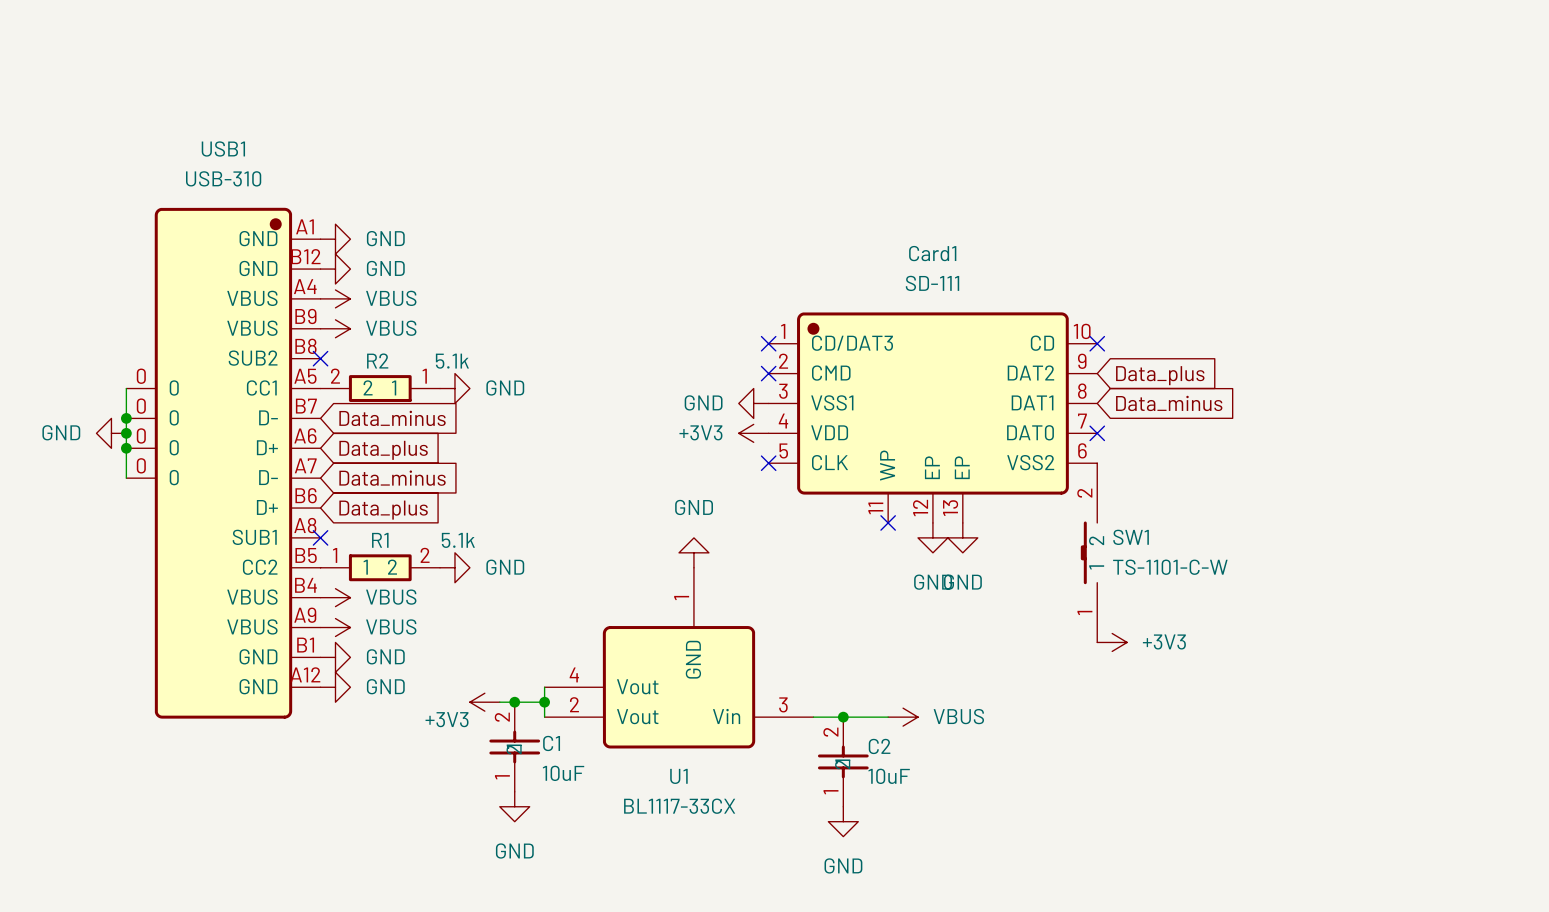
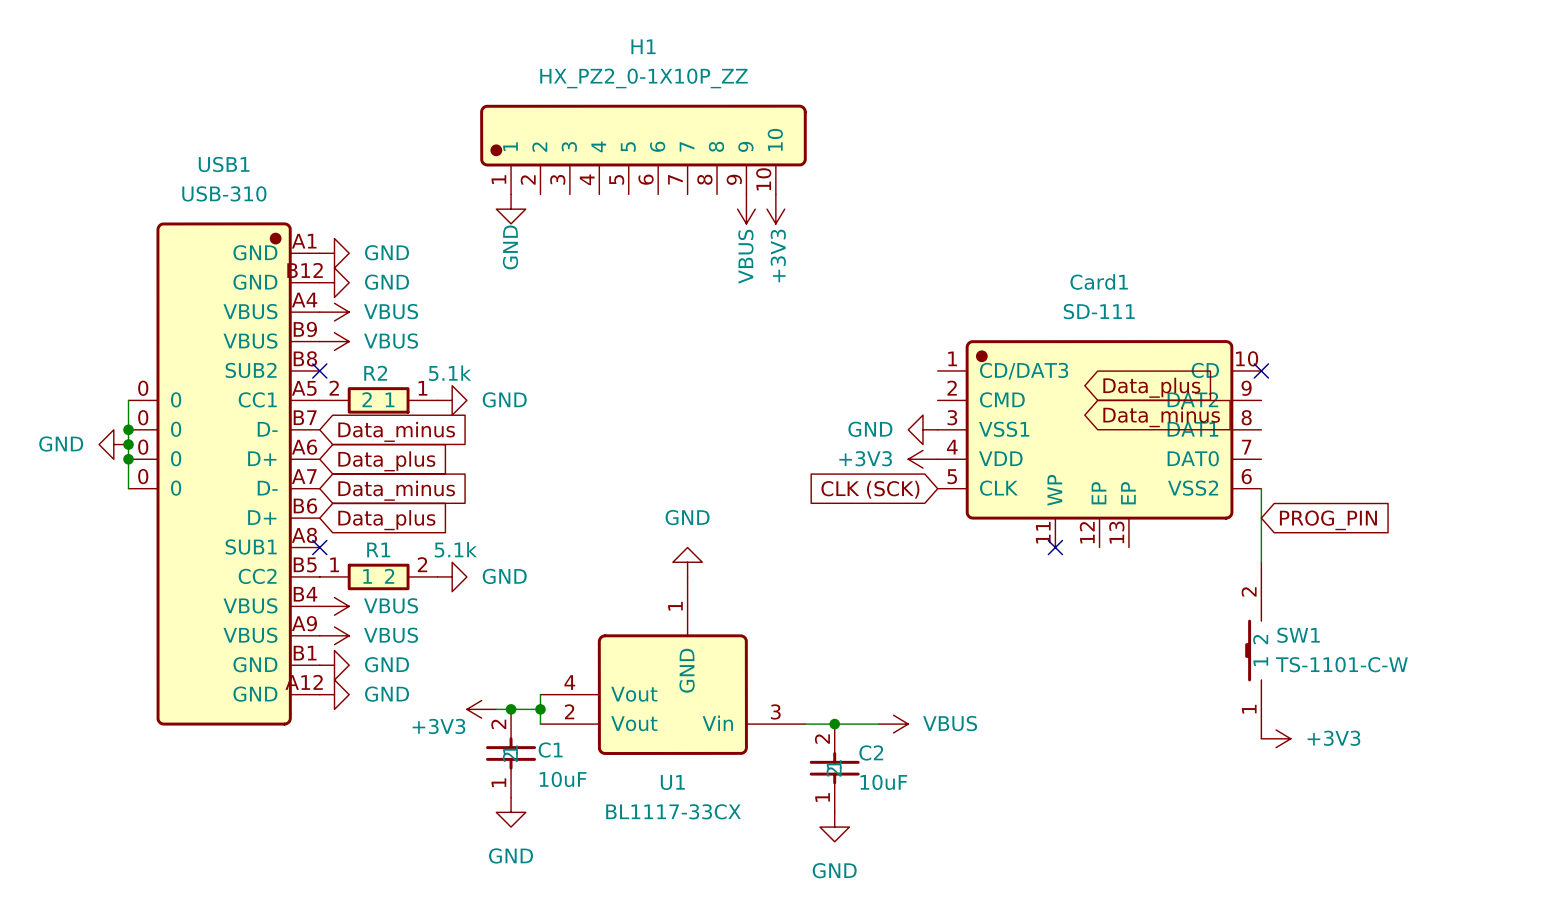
H1: none -> HX_PZ2_0-1X10P_ZZ (643, 149)
power symbol: none -> GND (511, 209)
power symbol: none -> VBUS (746, 209)
power symbol: none -> +3V3 (775, 209)
no-connect mark: (768, 343) -> none
no-connect mark: (1097, 343) -> none
no-connect mark: none -> (1261, 370)
no-connect mark: (768, 373) -> none
power symbol: GND (753, 403) -> none
Card1 position: (932, 417) -> (1099, 443)
power symbol: none -> GND (922, 429)
power symbol: +3V3 (753, 433) -> none
no-connect mark: (1097, 433) -> none
power symbol: none -> +3V3 (922, 459)
no-connect mark: (768, 463) -> none
global label: none -> CLK (SCK) (870, 489)
wire: none -> (1261, 488) (1261, 562)
global label: none -> PROG_PIN (1328, 520)
no-connect mark: (888, 522) -> none
power symbol: GND (932, 537) -> none
power symbol: GND (962, 537) -> none
no-connect mark: none -> (1055, 547)
SW1 position: (1089, 552) -> (1253, 650)
power symbol: +3V3 (1112, 642) -> none
power symbol: none -> +3V3 (1276, 738)

